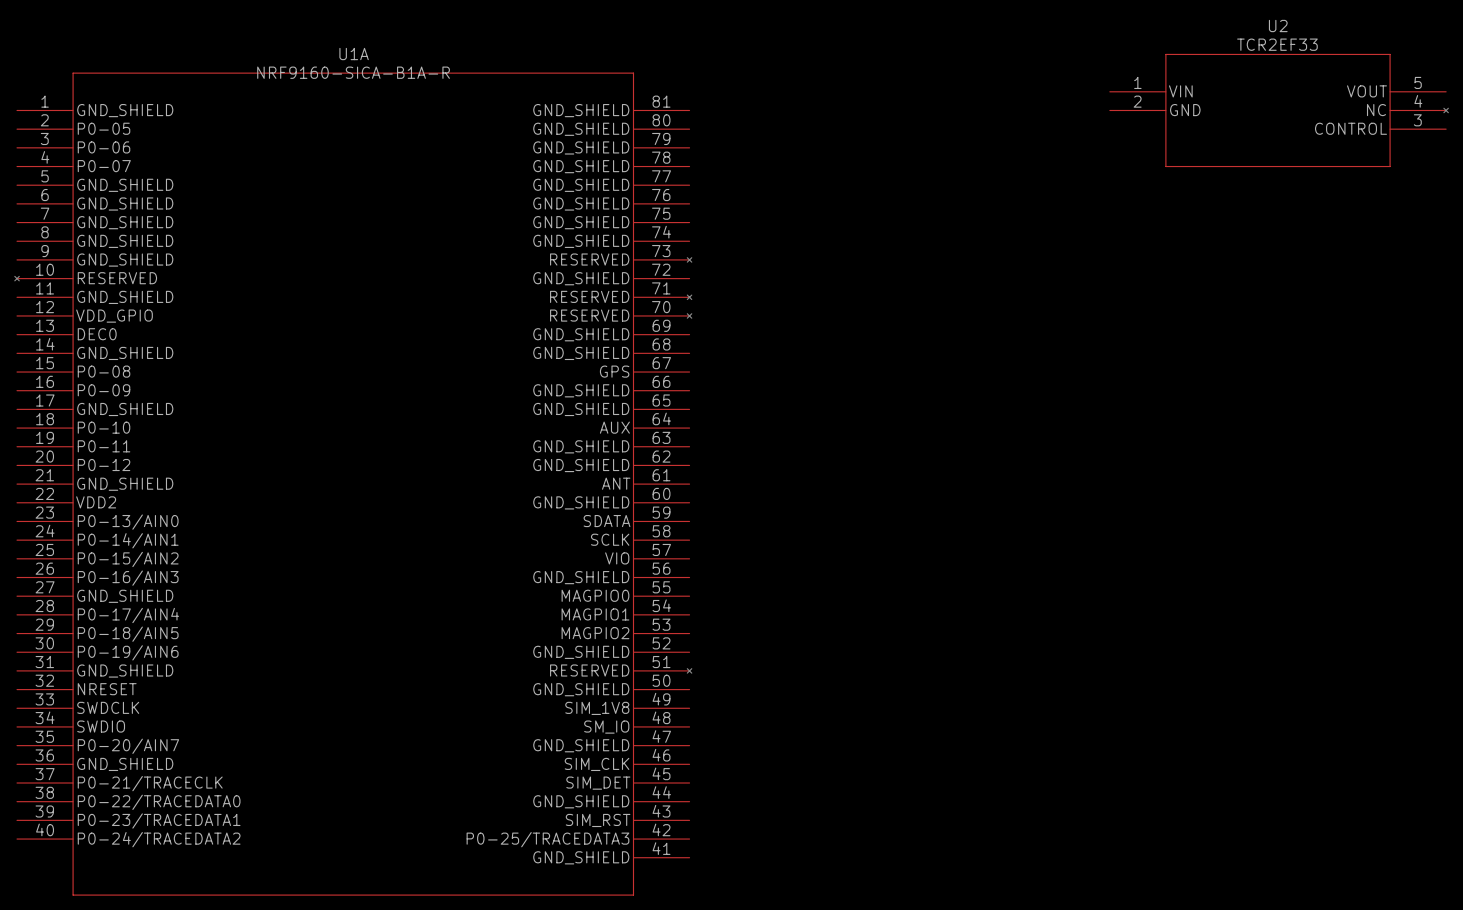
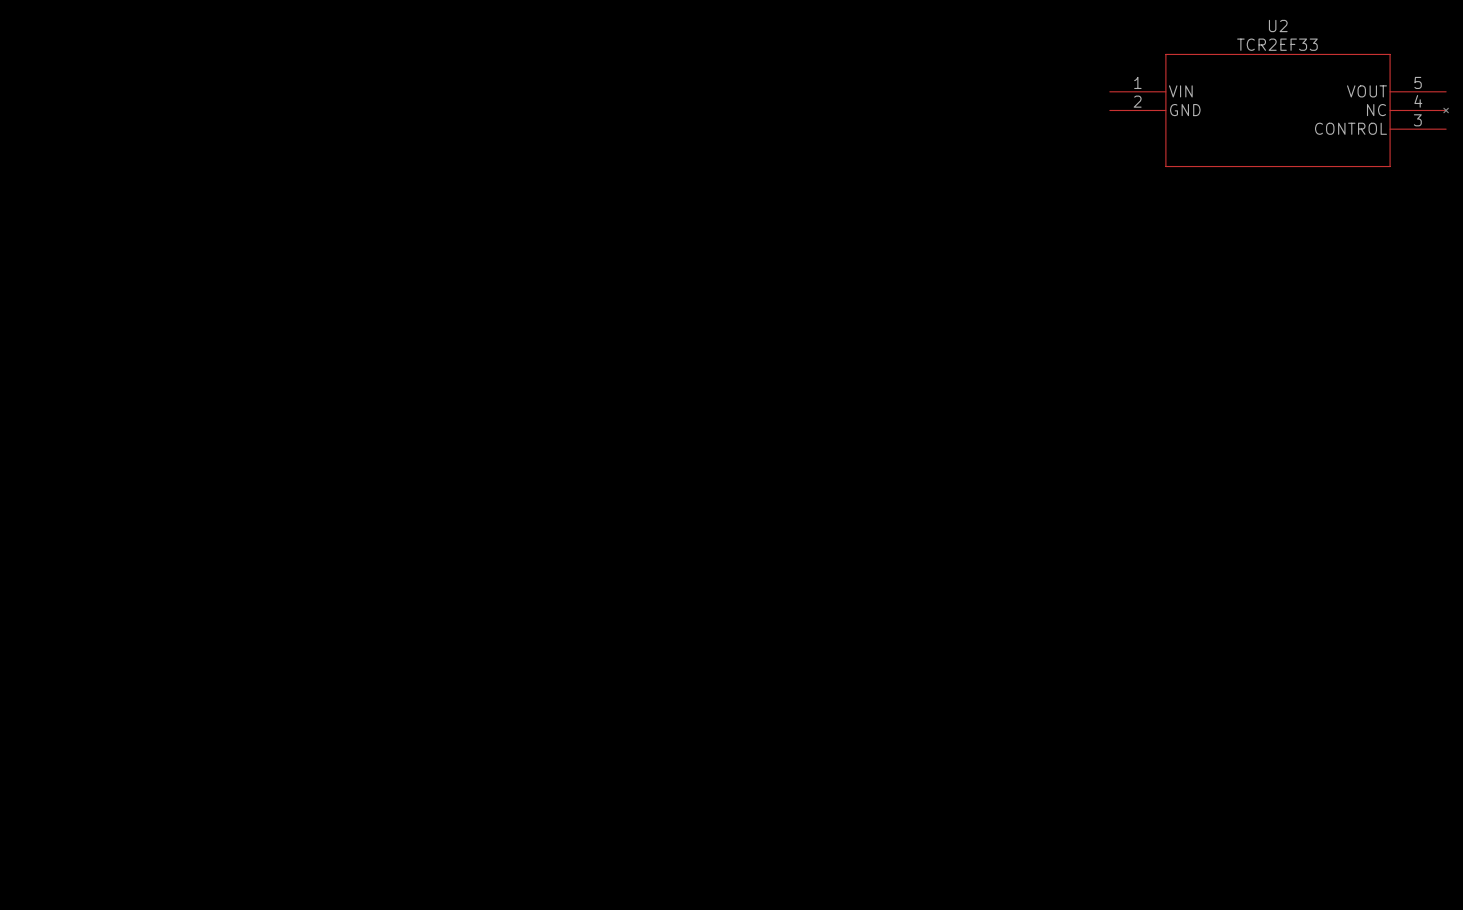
U1A: NRF9160-SICA-B1A-R (353, 484) -> none

